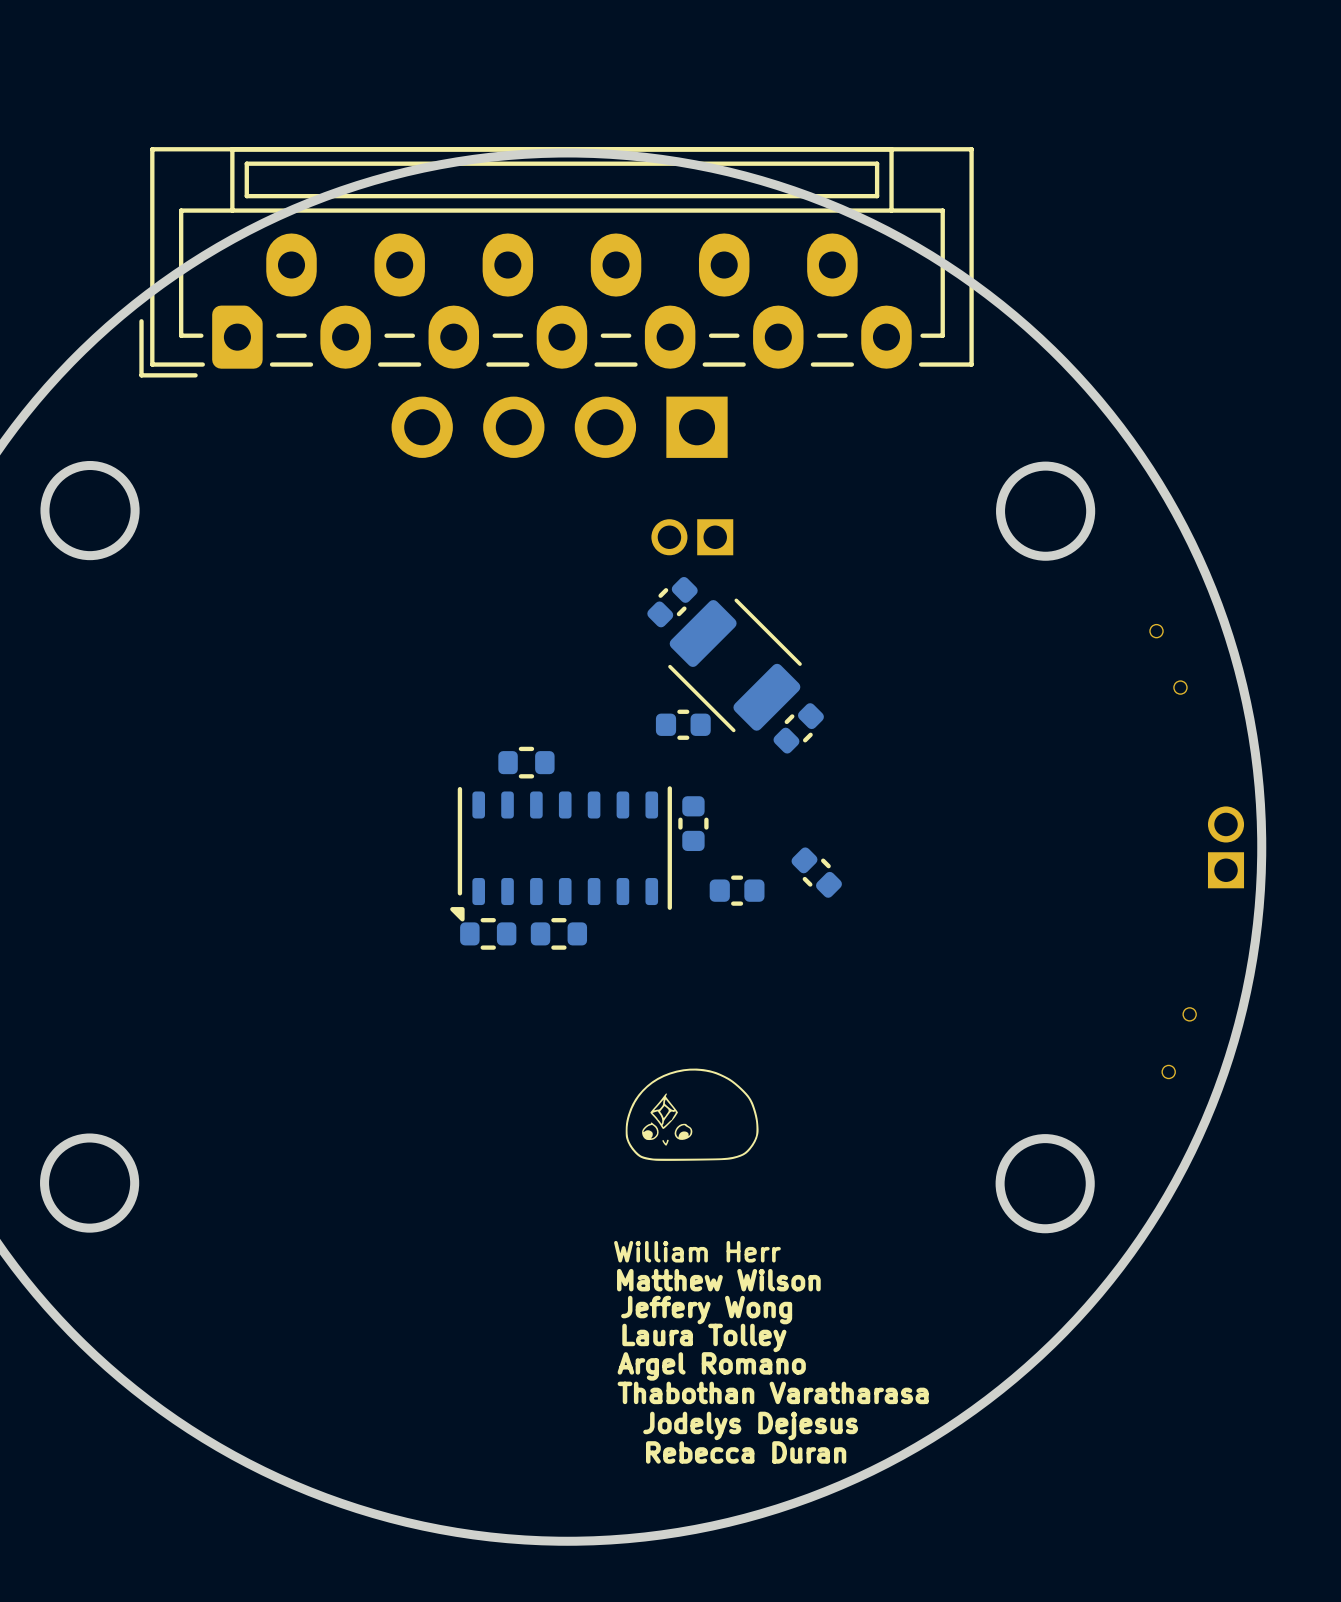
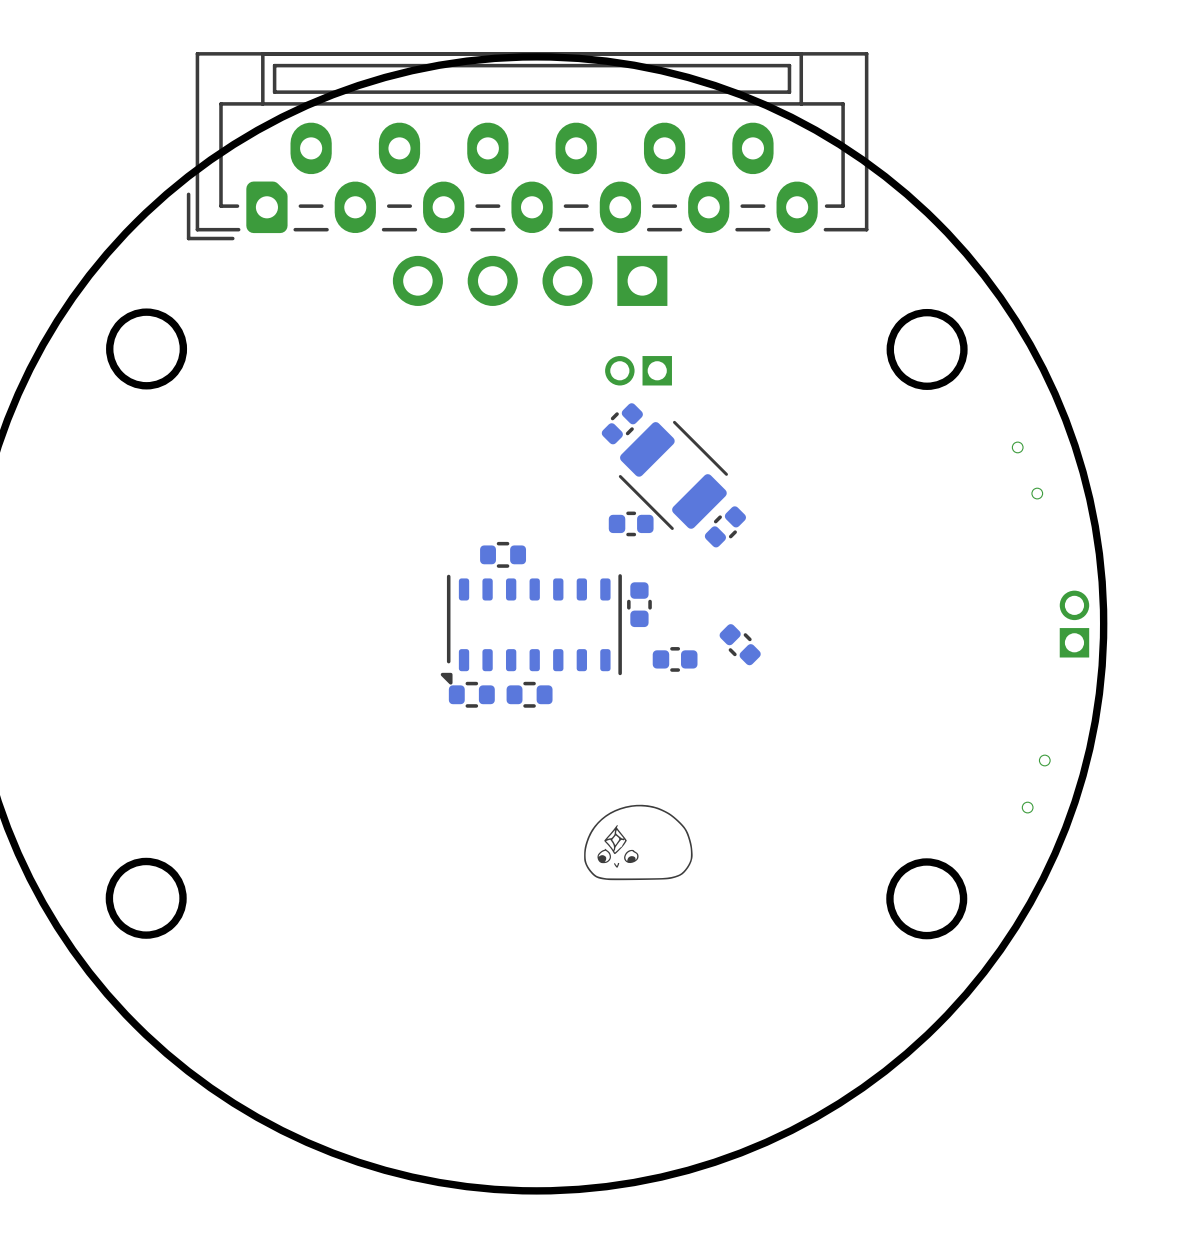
text: William Herr (697, 1251) -> none
text: Matthew Wilson (718, 1280) -> none
text: Jeffery Wong (706, 1310) -> none
text: Laura Tolley (704, 1337) -> none
text: Argel Romano (711, 1366) -> none
text: Thabothan Varatharasa (773, 1392) -> none
text: Jodelys Dejesus (750, 1425) -> none
text: Rebecca Duran (746, 1452) -> none

